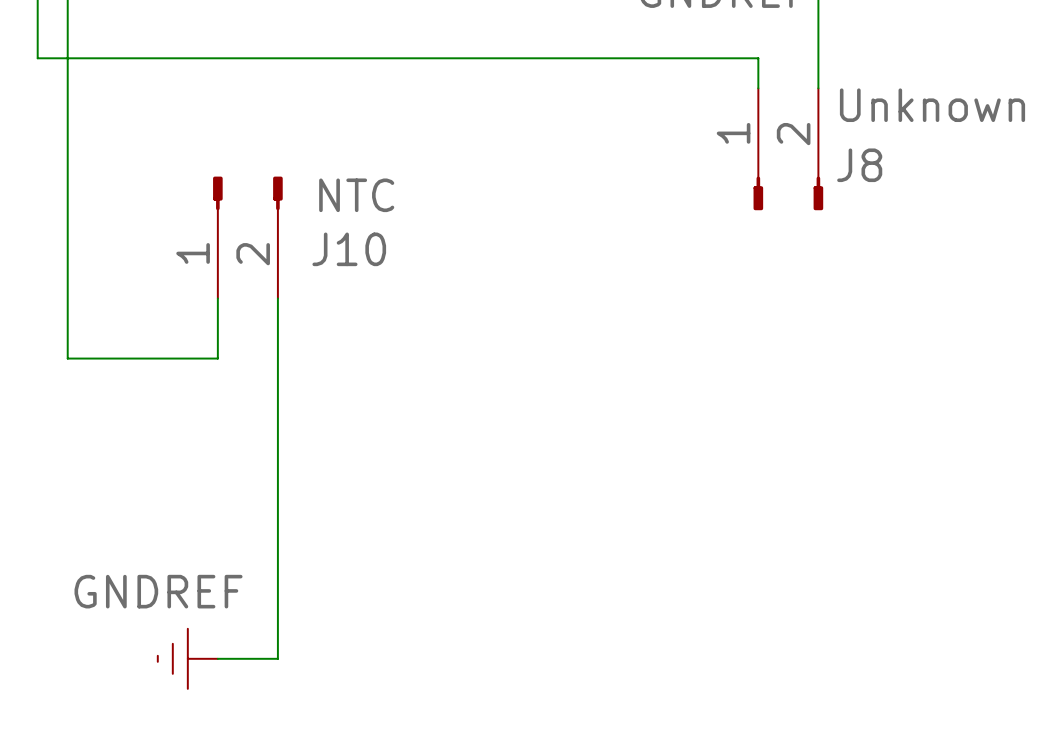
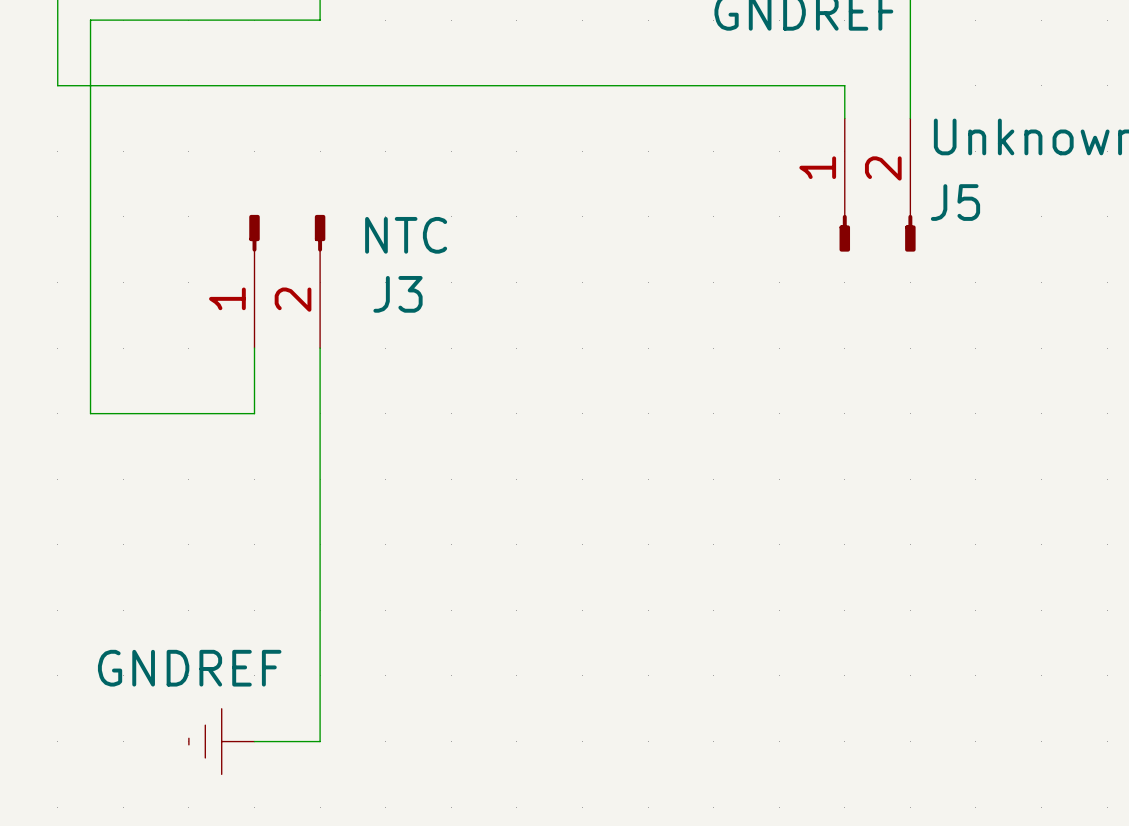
J8 name: J8 (859, 165) -> J5 (955, 202)
J10 name: J10 (349, 249) -> J3 (398, 294)

